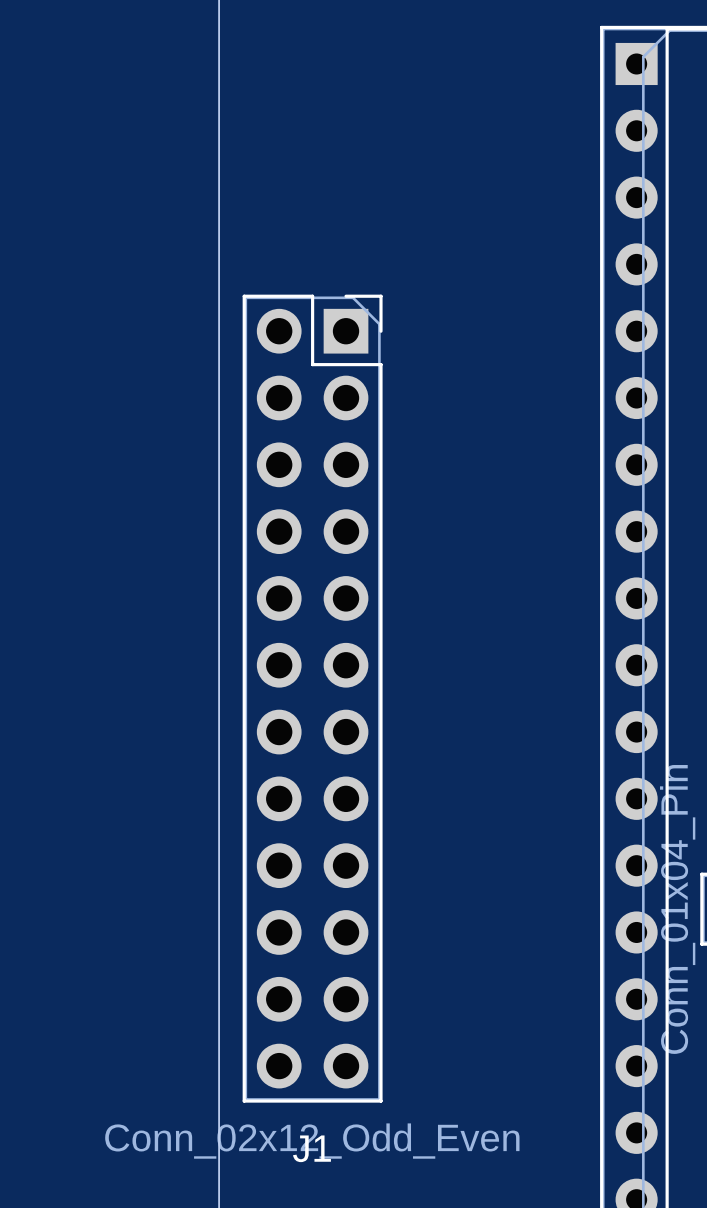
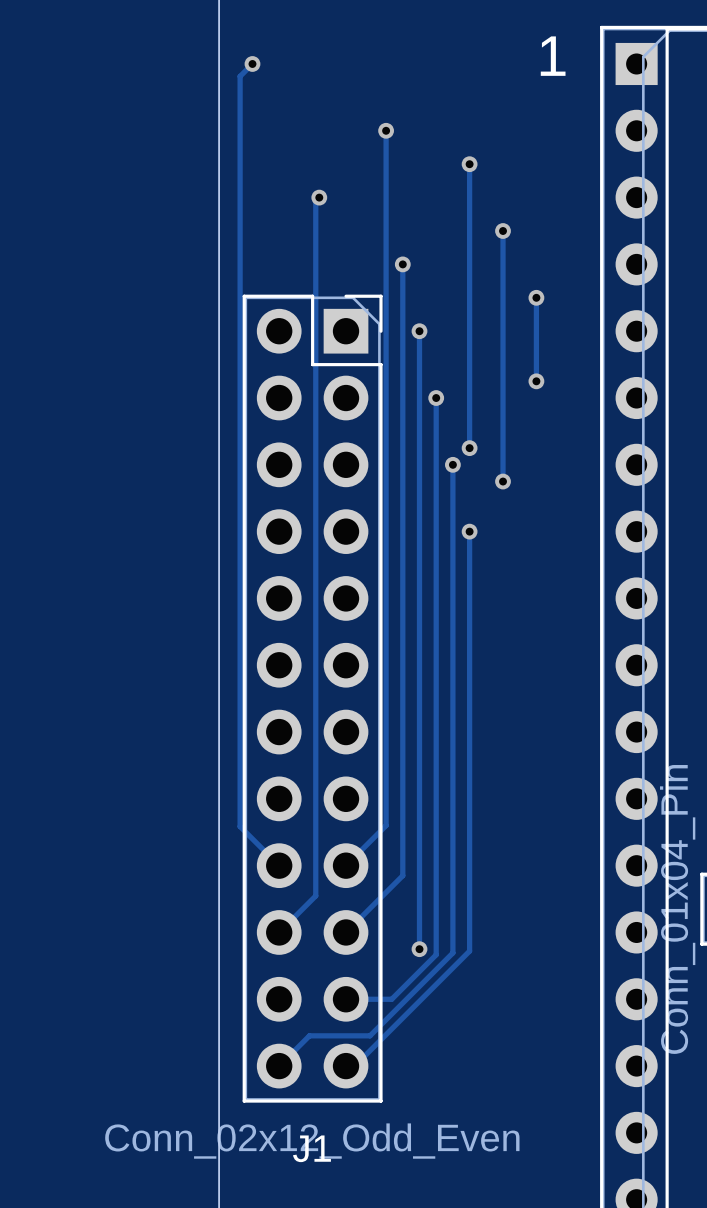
text: none -> 1 (553, 56)
track: none -> (252, 63) (240, 76) (240, 826) (279, 865)
via: none -> (252, 63)
track: none -> (386, 130) (386, 825) (346, 865)
via: none -> (386, 130)
track: none -> (469, 164) (469, 448)
via: none -> (469, 164)
track: none -> (319, 197) (315, 201) (315, 895) (279, 932)
via: none -> (319, 197)
track: none -> (503, 231) (503, 481)
via: none -> (503, 231)
track: none -> (402, 264) (402, 875) (346, 932)
via: none -> (402, 264)
track: none -> (536, 297) (536, 381)
via: none -> (536, 297)
track: none -> (419, 331) (419, 949)
via: none -> (419, 331)
via: none -> (536, 381)
track: none -> (436, 398) (436, 954) (391, 999) (346, 999)
via: none -> (436, 398)
via: none -> (469, 448)
track: none -> (452, 464) (452, 952) (370, 1035) (309, 1035) (279, 1066)
via: none -> (452, 464)
via: none -> (503, 481)
track: none -> (469, 531) (469, 951) (354, 1066) (346, 1066)
via: none -> (469, 531)
via: none -> (419, 949)

